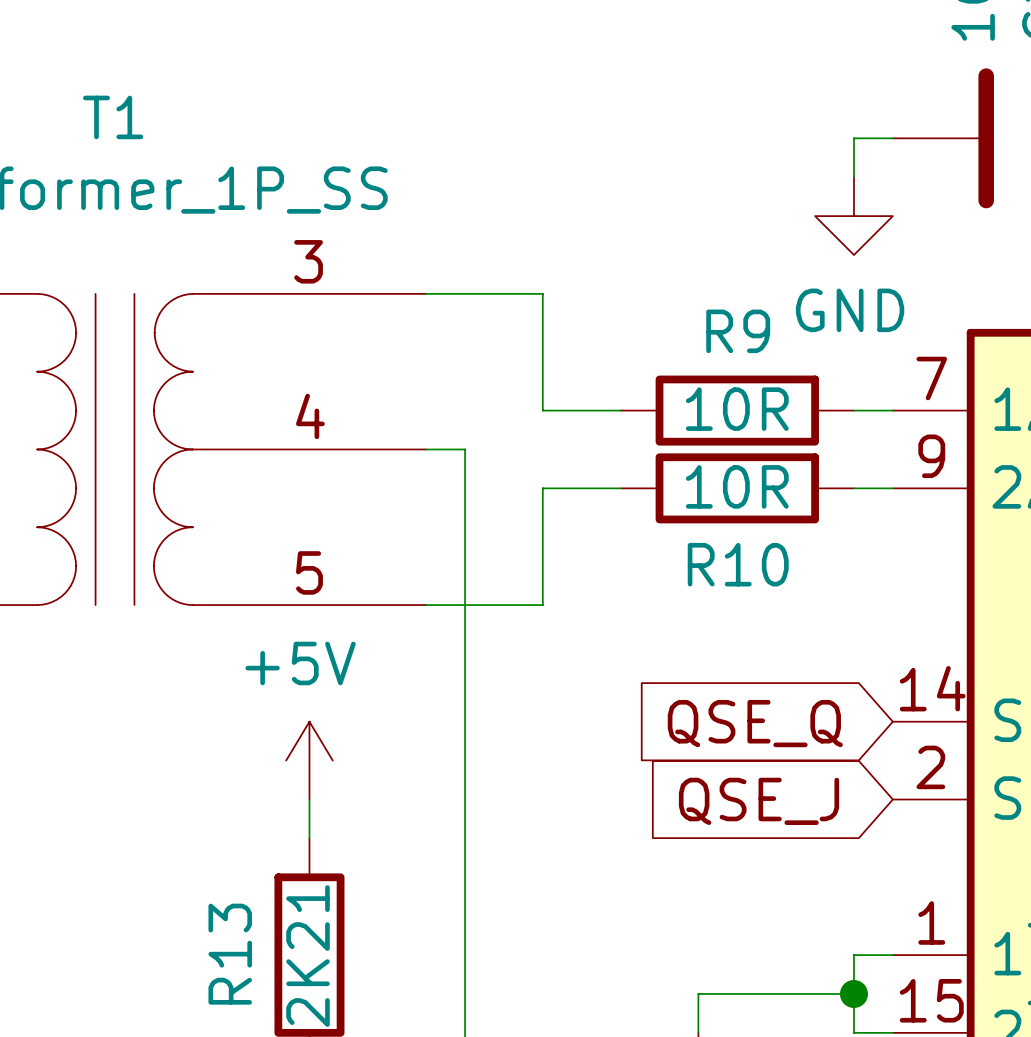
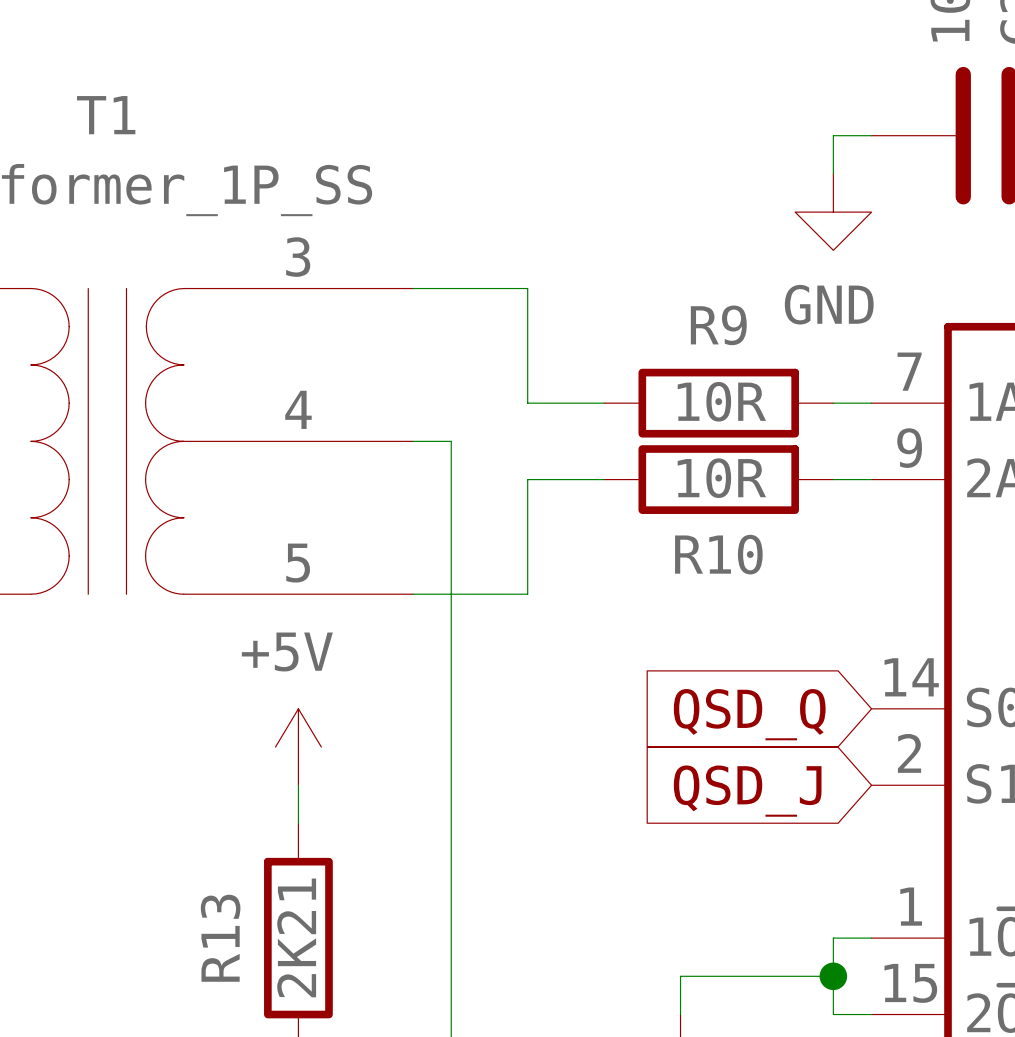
global label: QSE_Q (755, 723) -> QSD_Q (749, 714)
global label: QSE_J (758, 801) -> QSD_J (747, 791)

